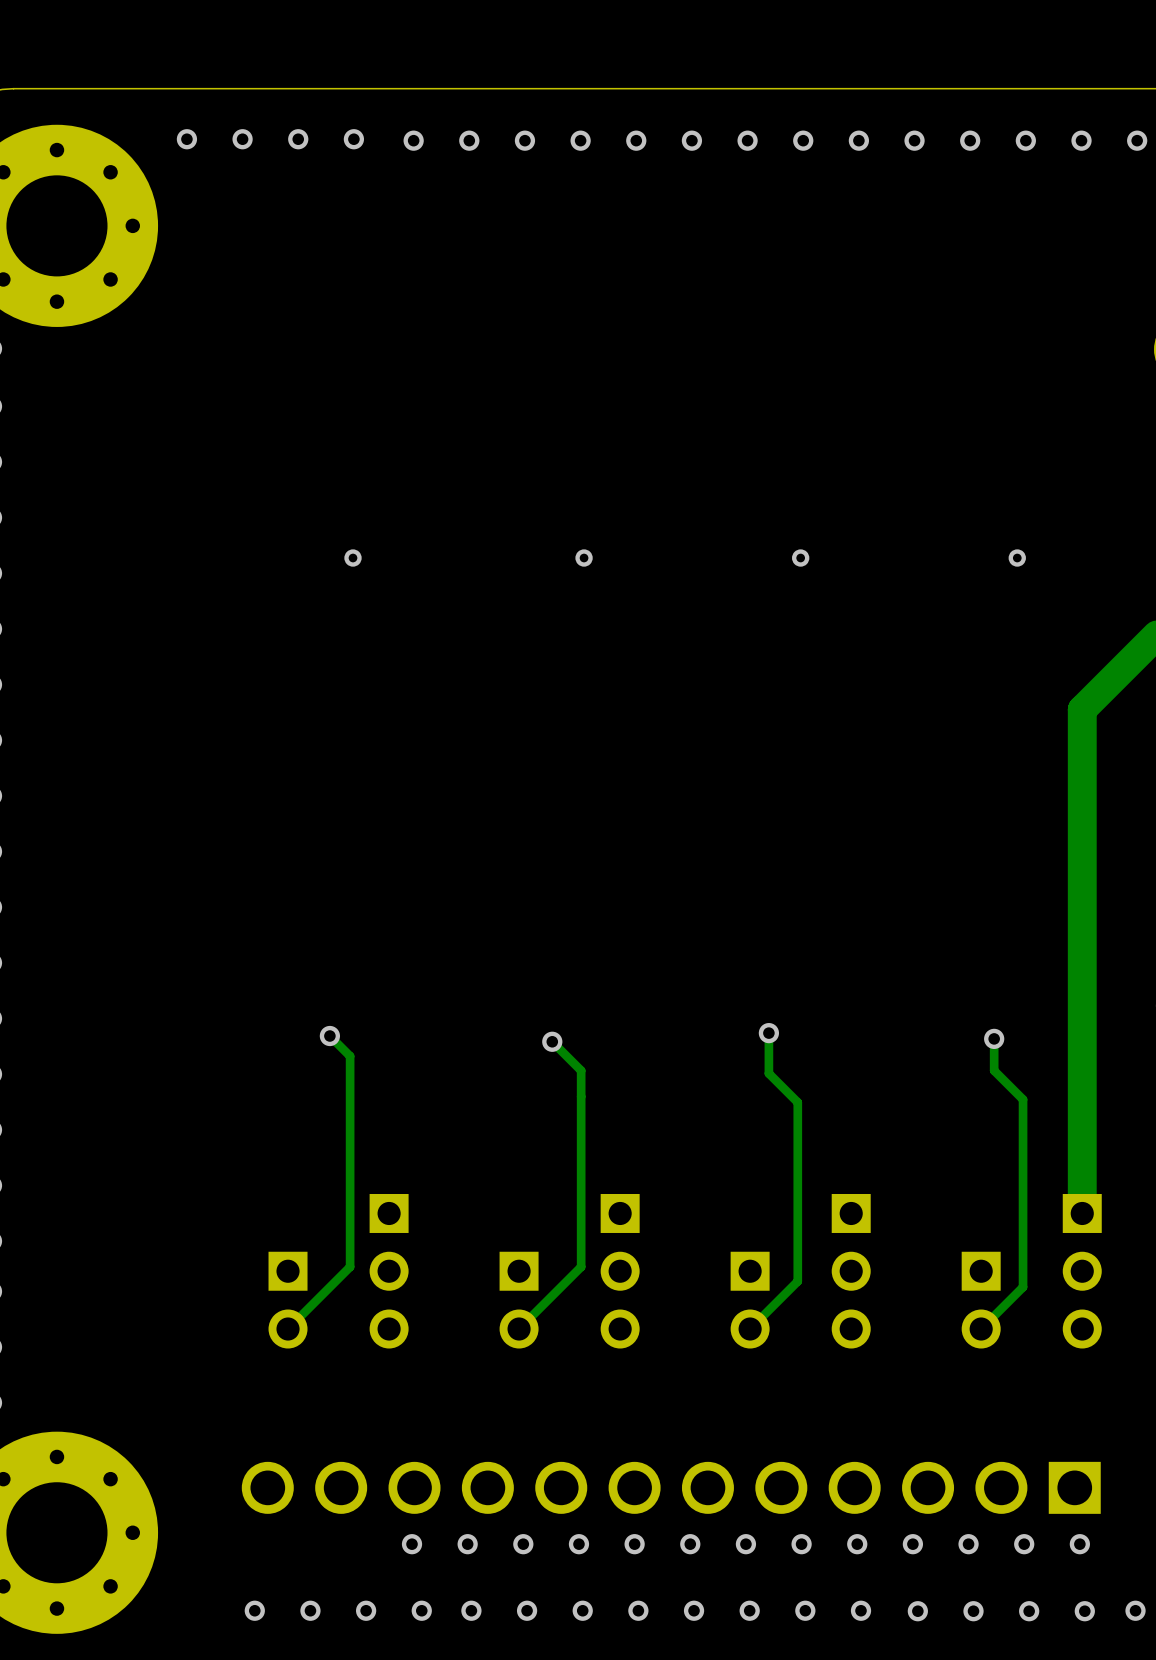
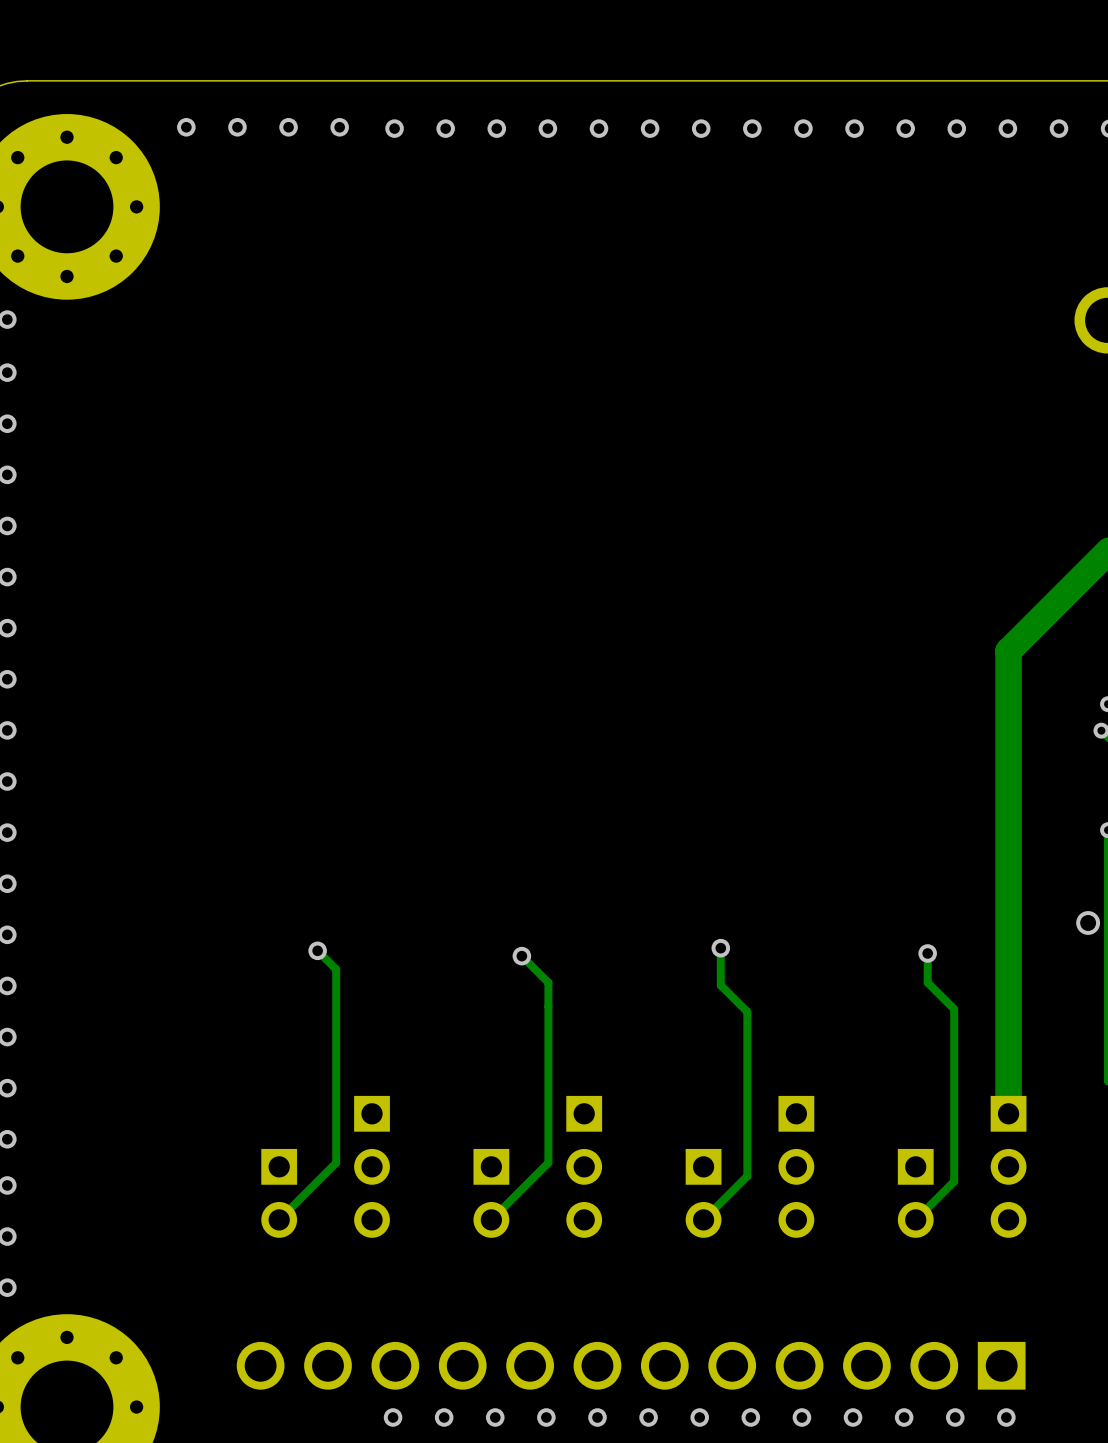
via: (353, 558) -> none
via: (584, 558) -> none
via: (800, 558) -> none
via: (1017, 558) -> none

